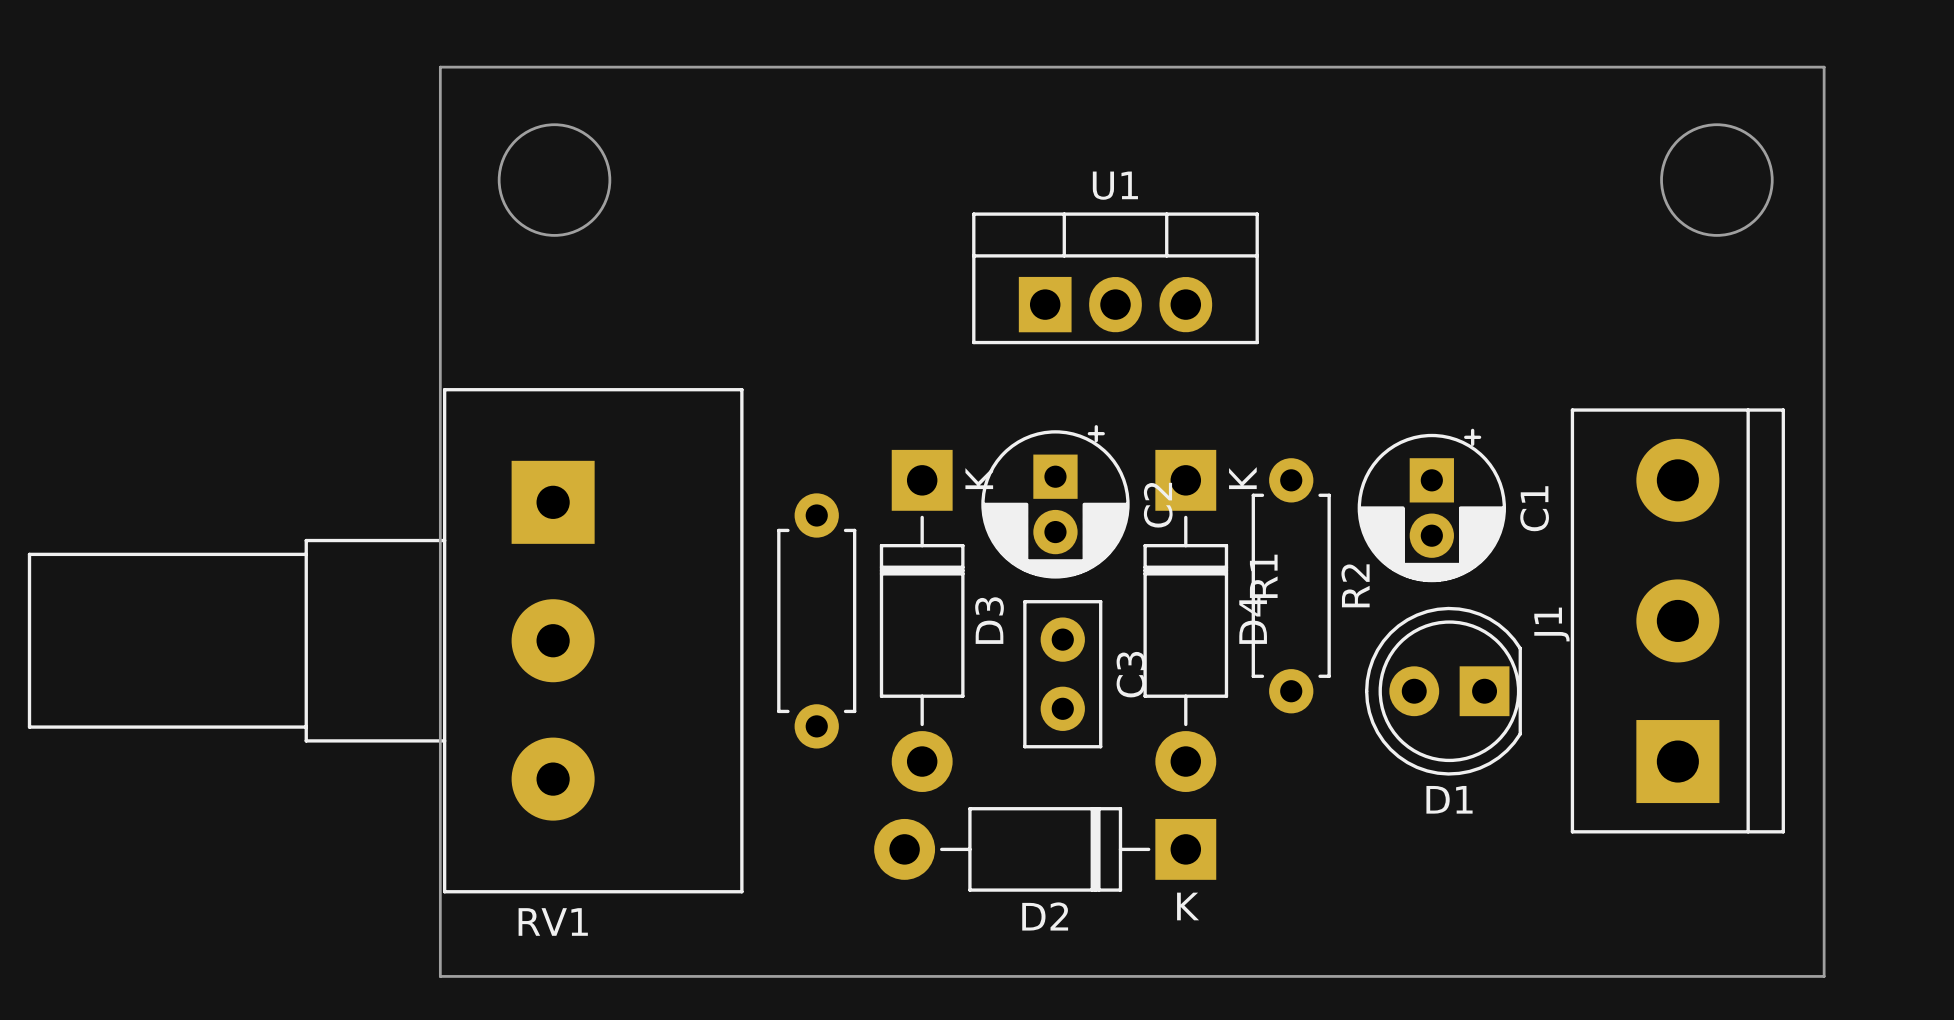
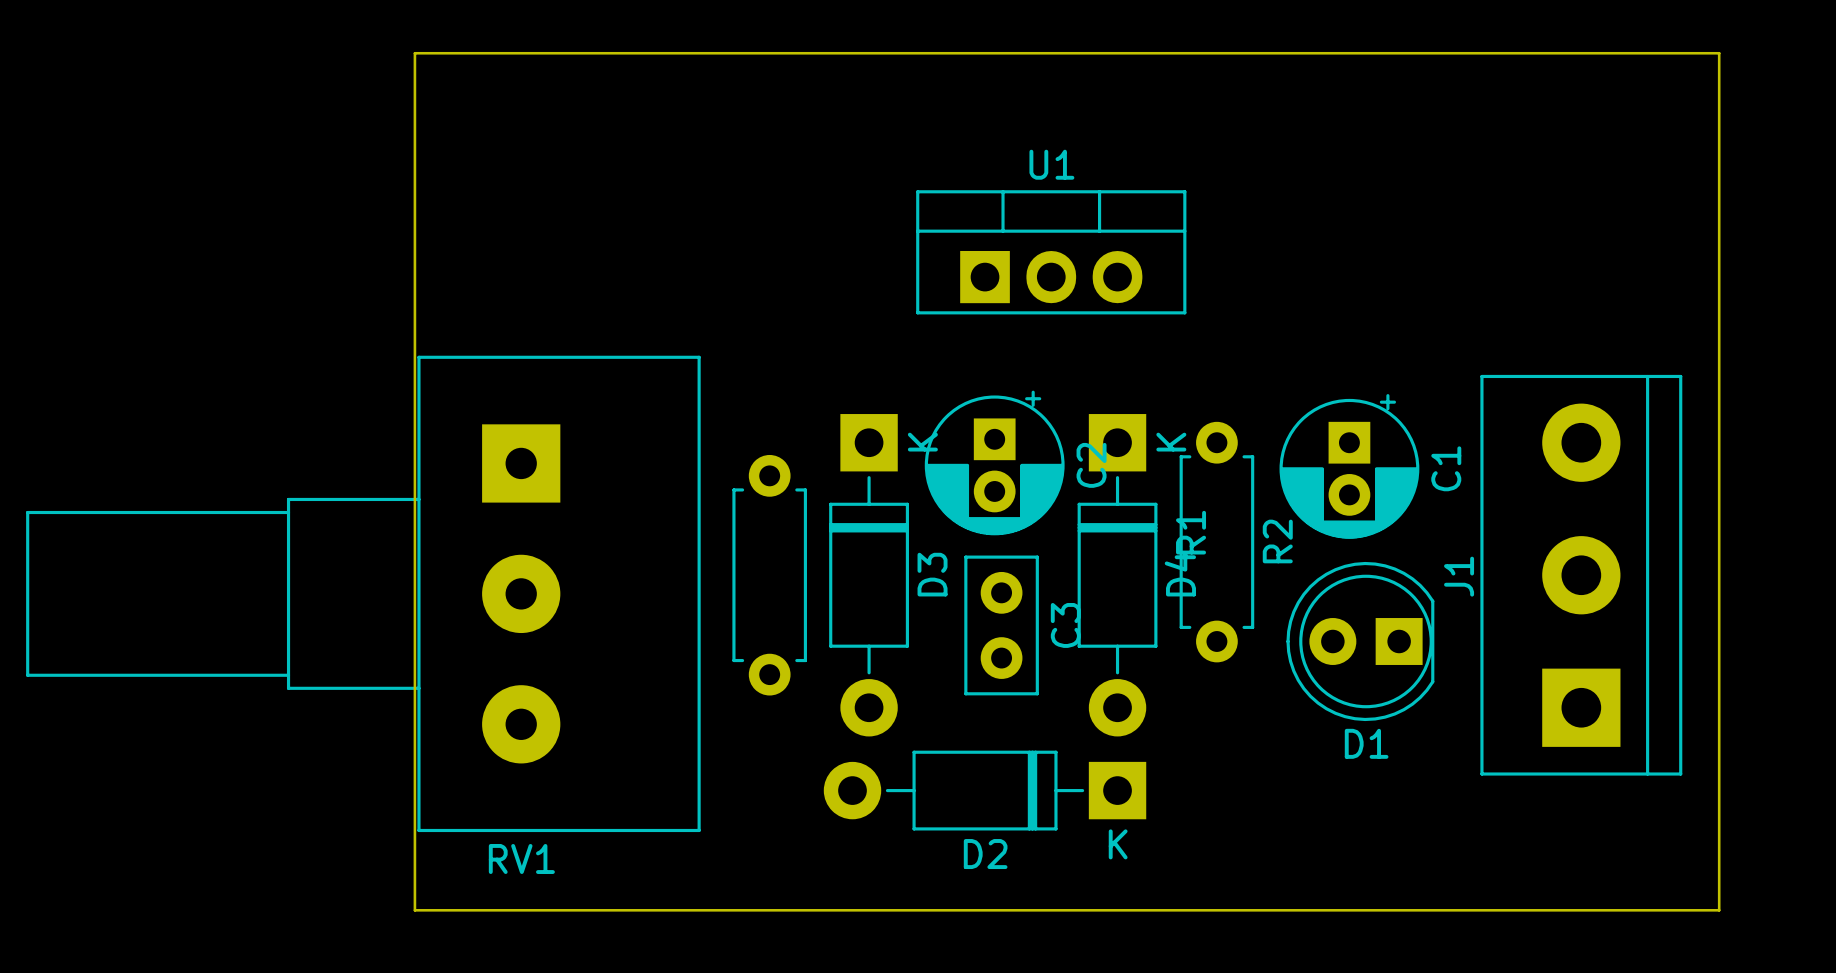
round board edge: [497, 123, 612, 237] -> none
round board edge: [1660, 123, 1774, 237] -> none

